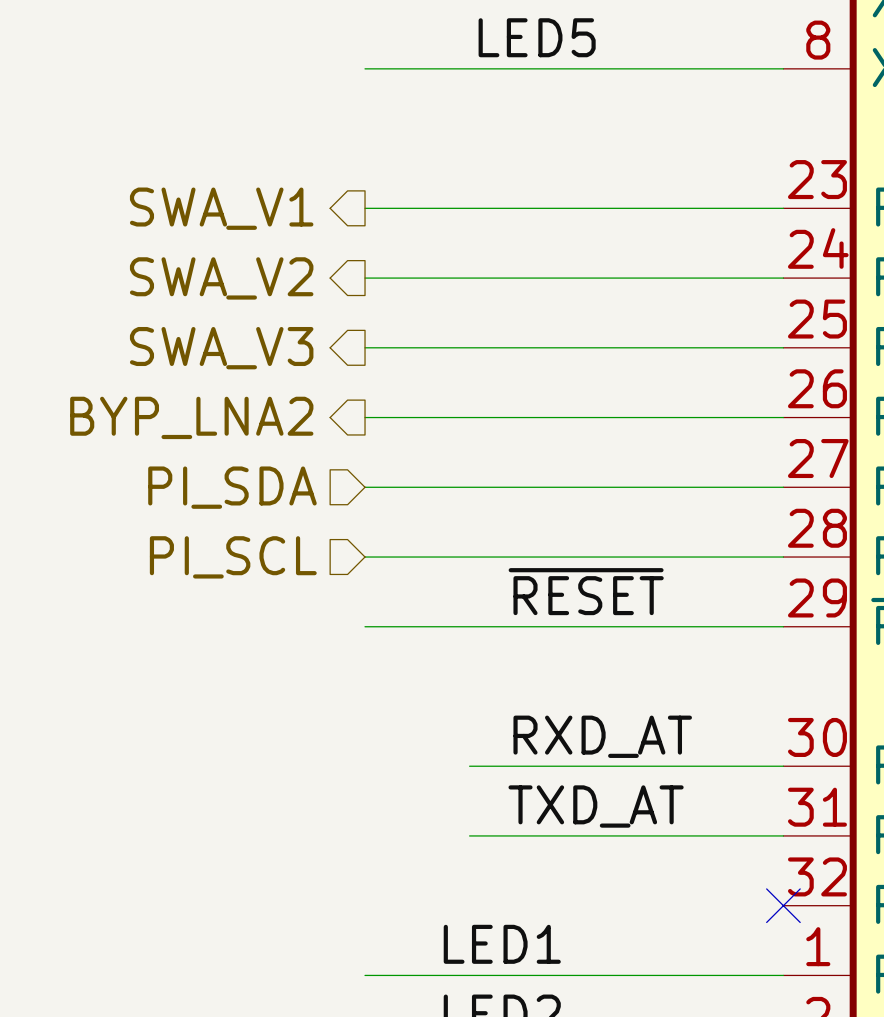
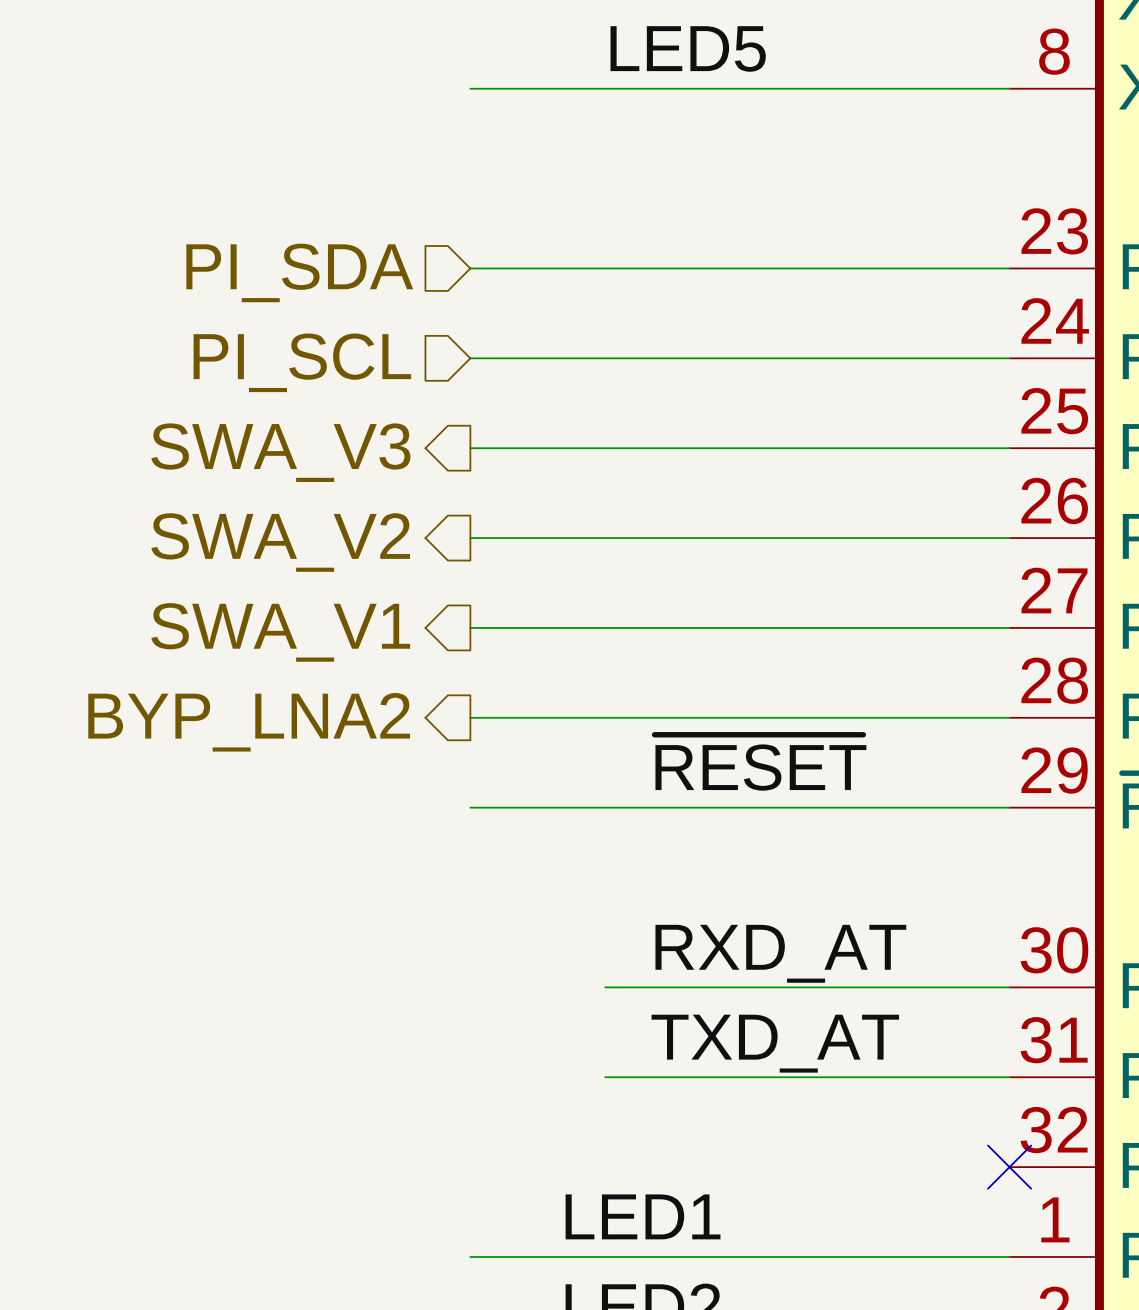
hierarchical label shape: output (221, 208) -> input (299, 272)
hierarchical label: SWA_V1 (221, 208) -> PI_SDA (299, 272)
hierarchical label shape: output (221, 278) -> input (302, 362)
hierarchical label: SWA_V2 (221, 278) -> PI_SCL (302, 362)
hierarchical label: BYP_LNA2 (191, 417) -> SWA_V2 (280, 542)
hierarchical label shape: input (232, 487) -> output (280, 632)
hierarchical label: PI_SDA (232, 487) -> SWA_V1 (280, 632)
hierarchical label shape: input (233, 557) -> output (249, 722)
hierarchical label: PI_SCL (233, 557) -> BYP_LNA2 (249, 722)

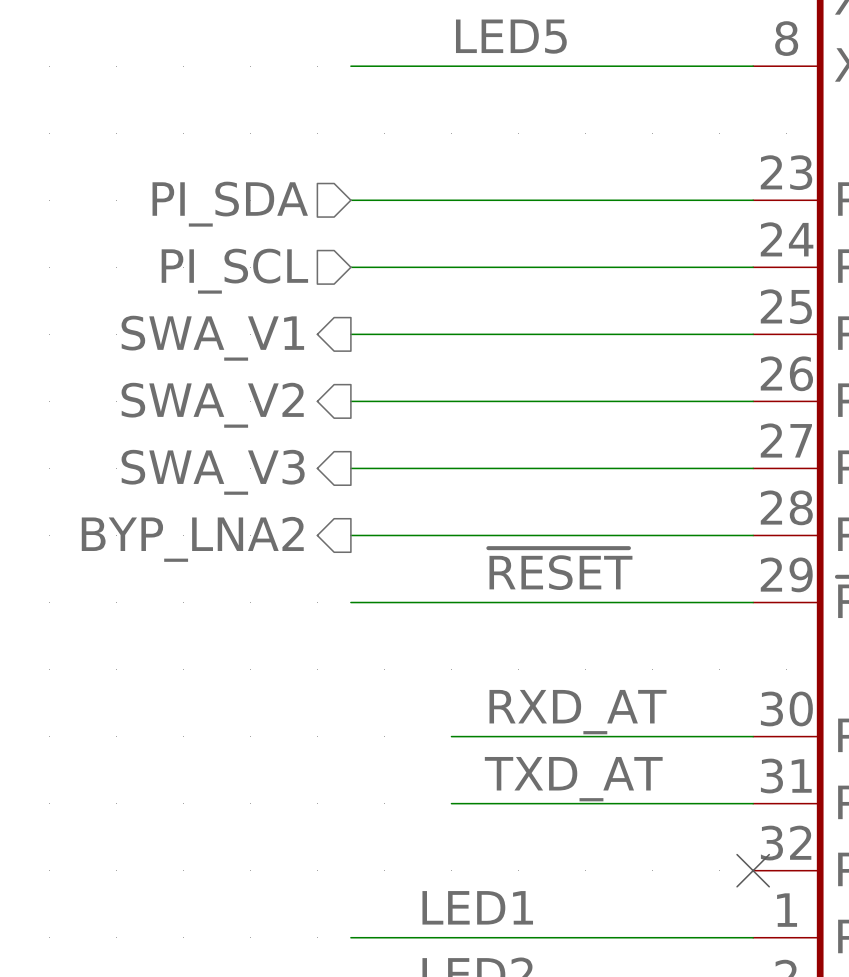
hierarchical label: SWA_V3 (280, 452) -> SWA_V1 (212, 338)
hierarchical label: SWA_V1 (280, 632) -> SWA_V3 (213, 472)

